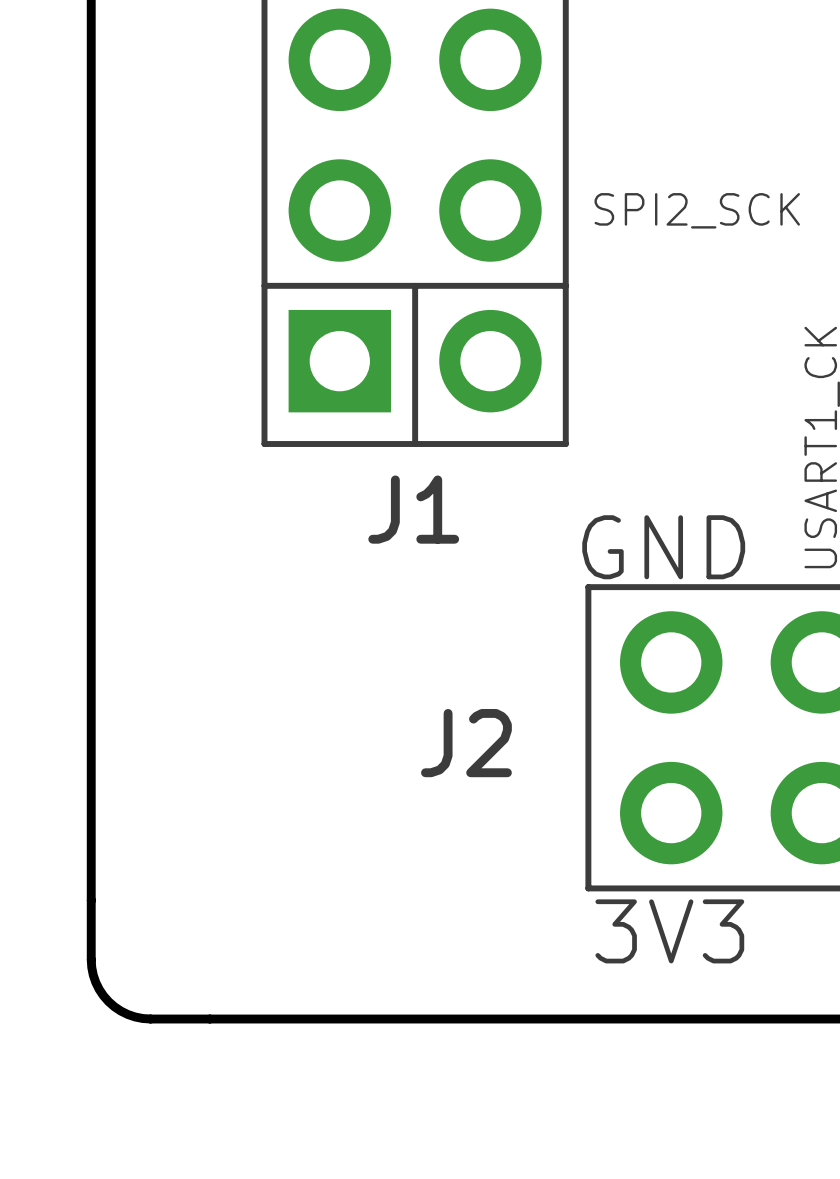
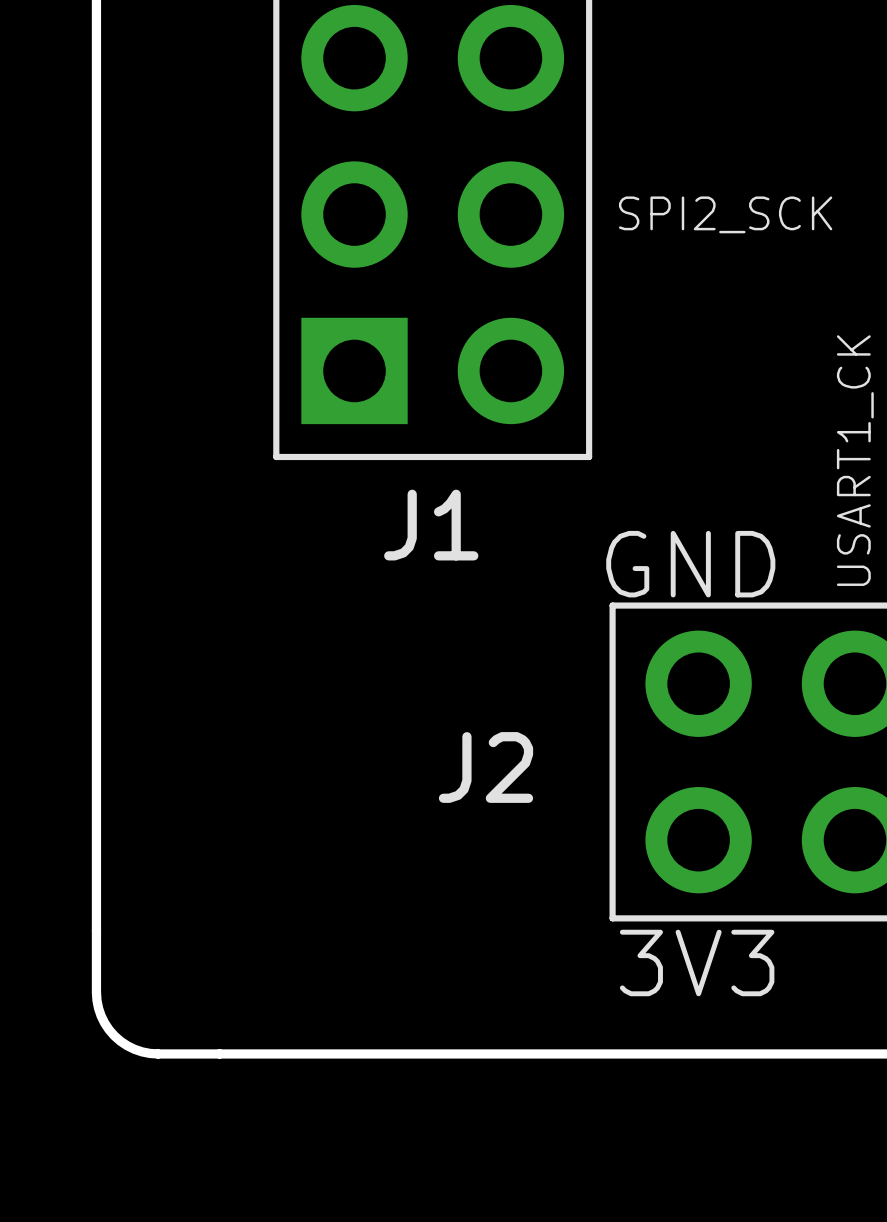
line: (415, 285) (415, 444) -> none
line: (565, 285) (264, 285) -> none

